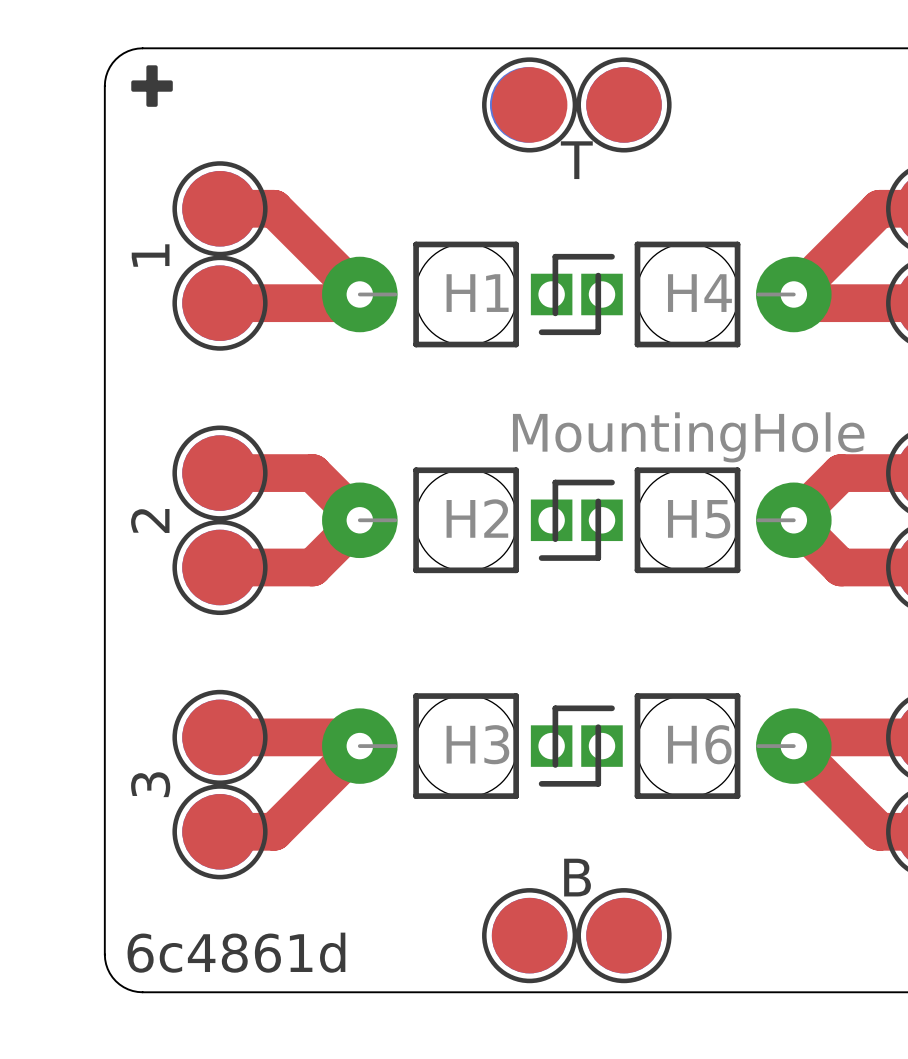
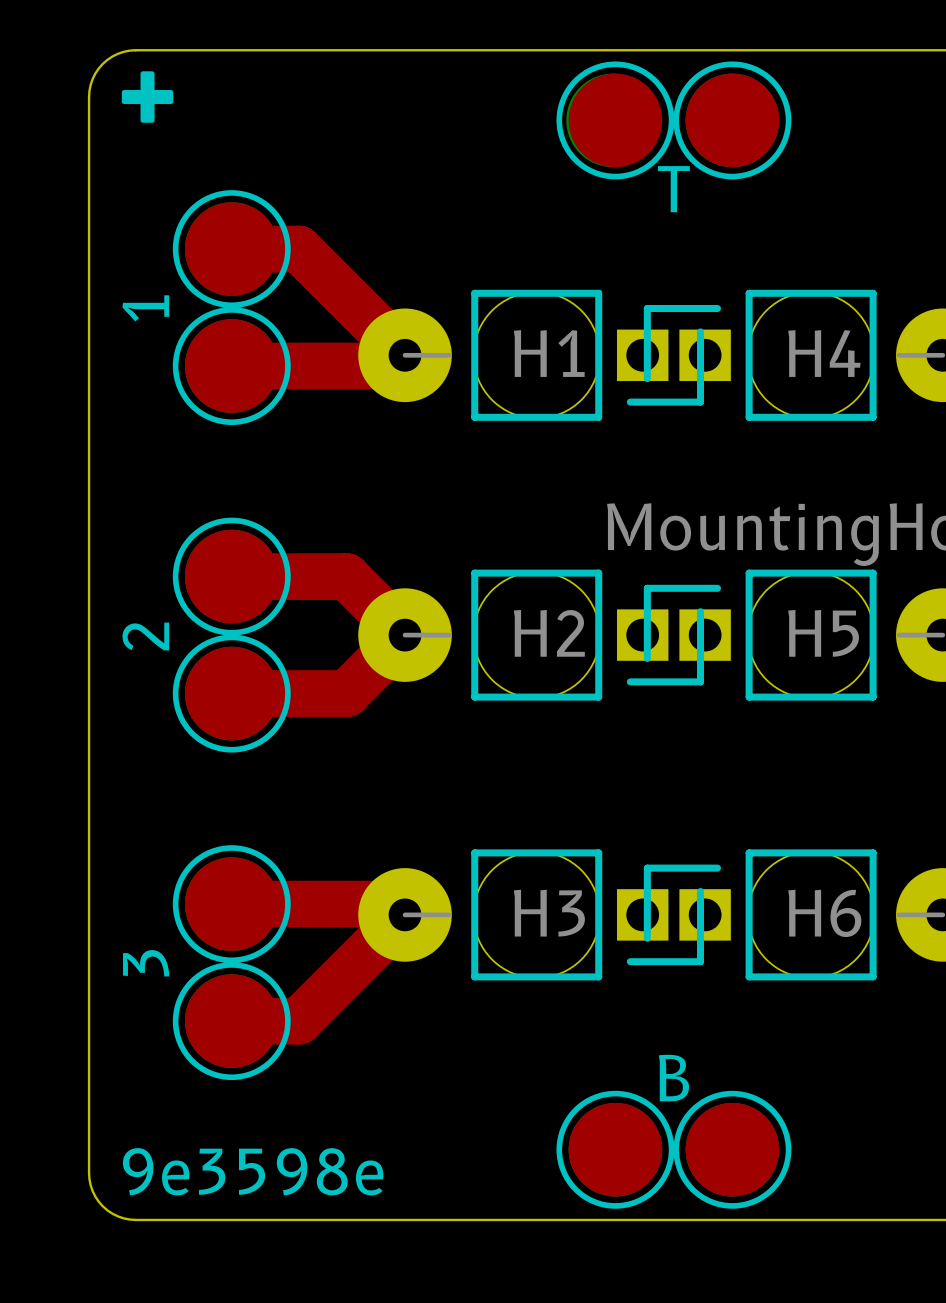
text: 6c4861d (236, 952) -> 9e3598e (253, 1171)

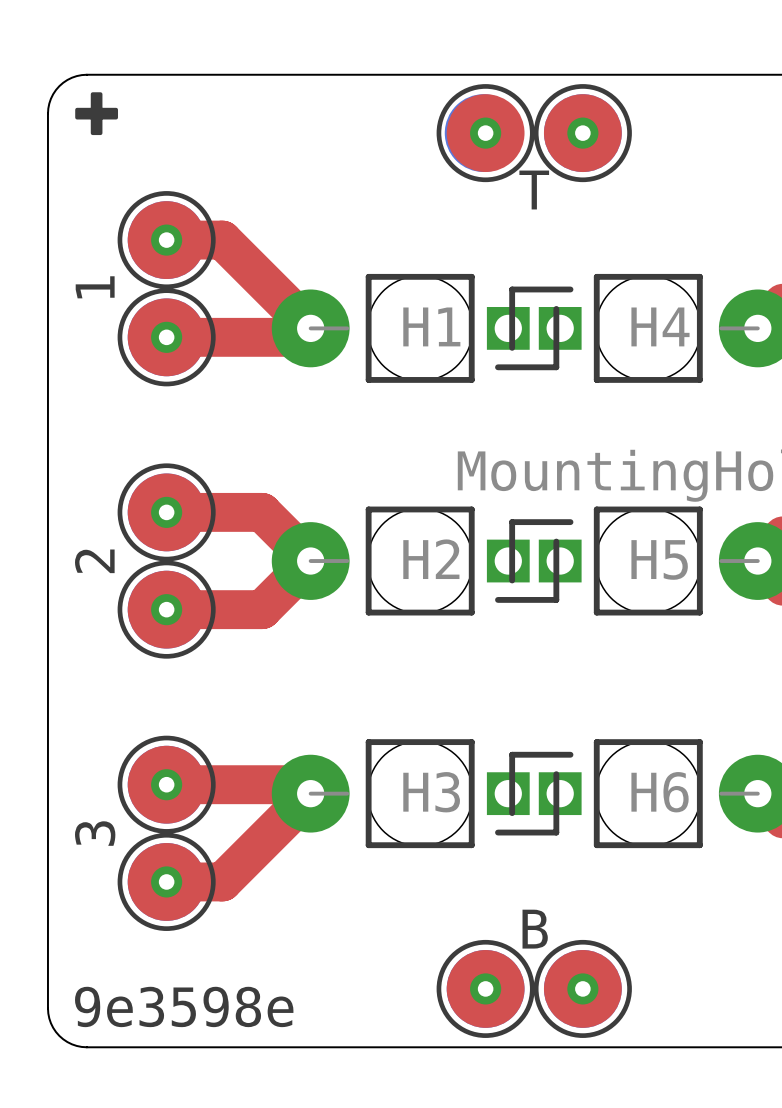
via: none -> (485, 133)
via: none -> (582, 133)
via: none -> (166, 240)
via: none -> (166, 337)
via: none -> (166, 512)
via: none -> (166, 609)
via: none -> (166, 784)
via: none -> (166, 881)
via: none -> (485, 988)
via: none -> (582, 988)

